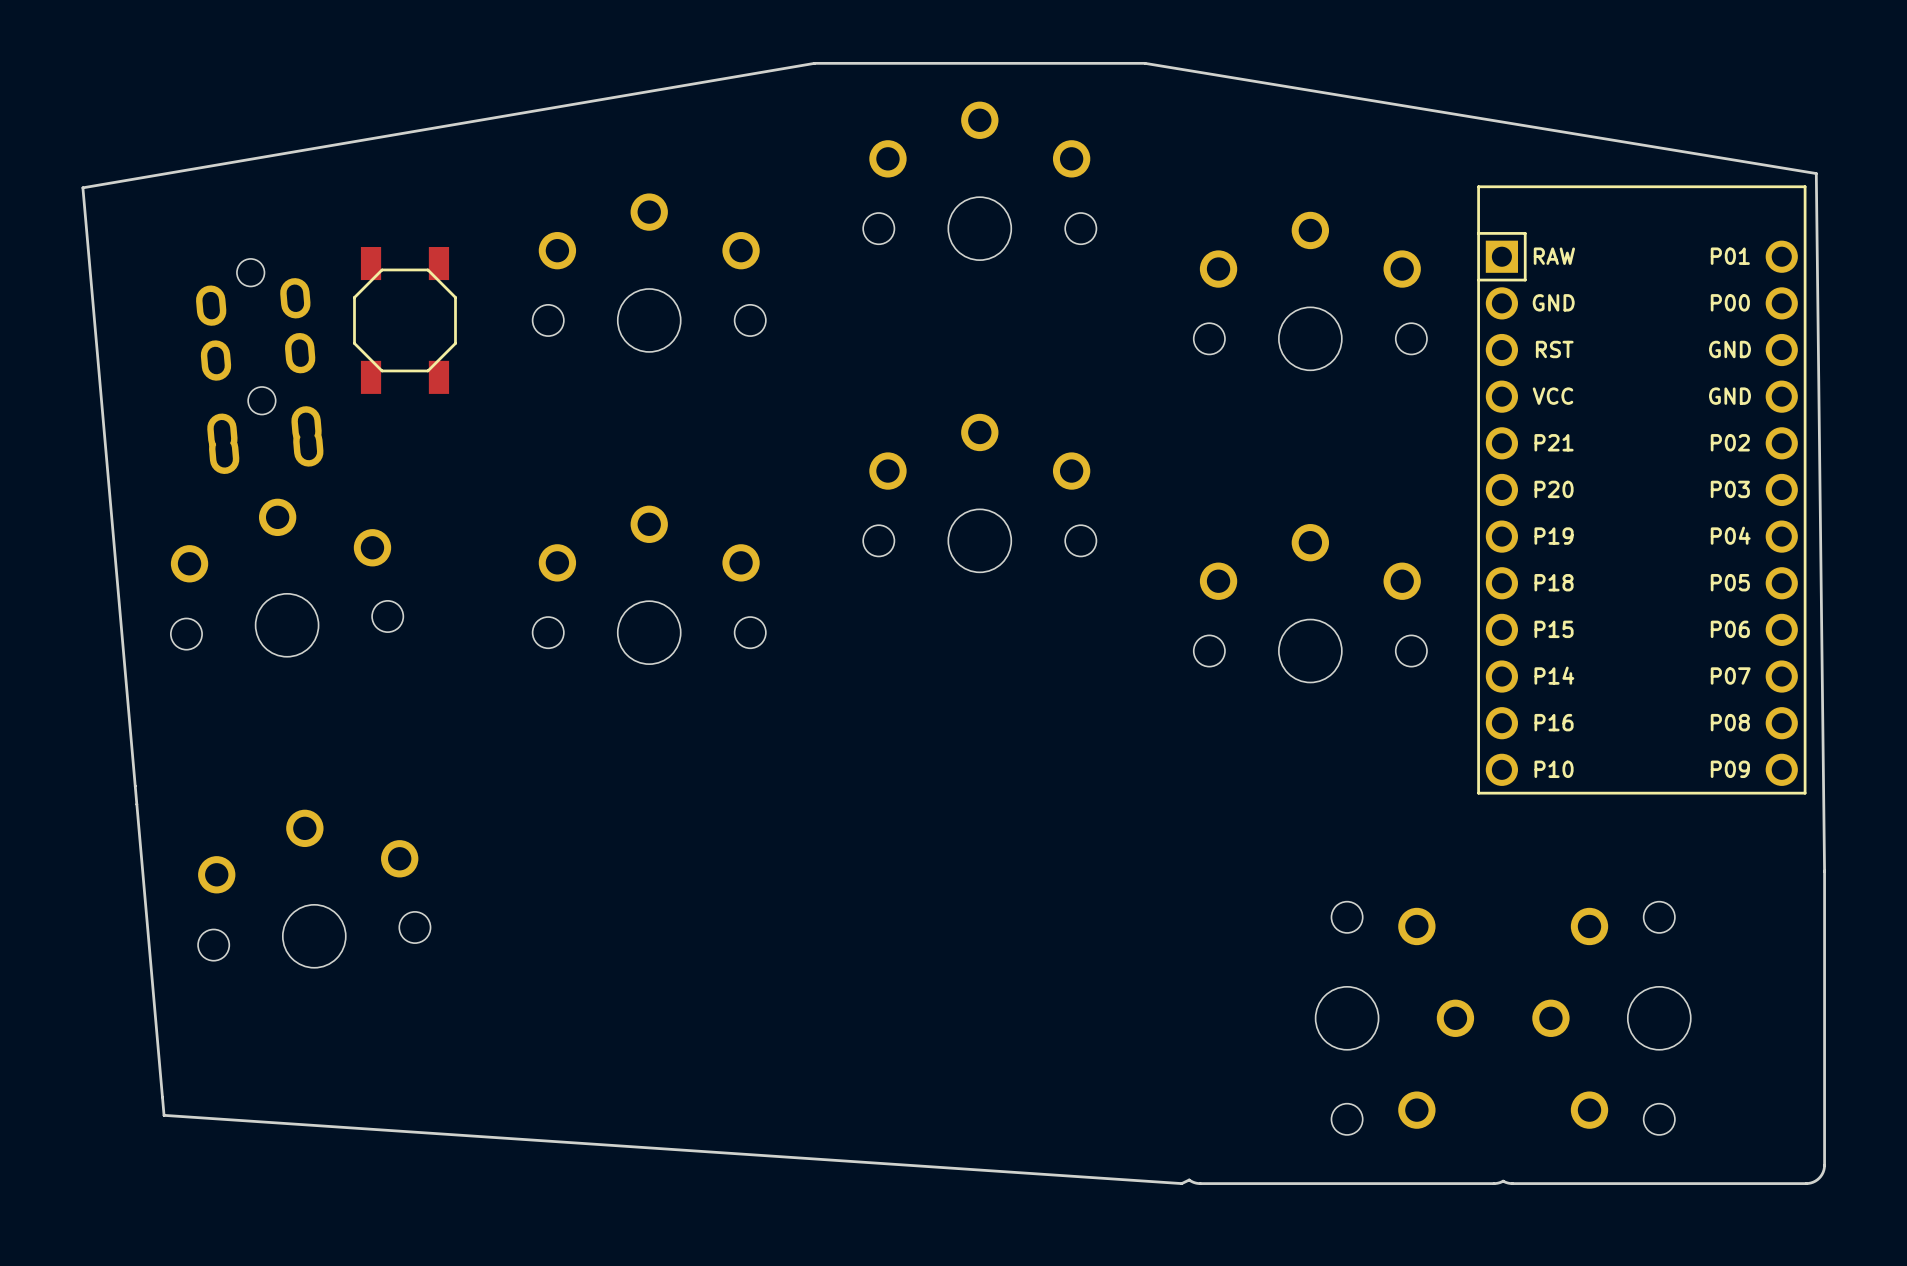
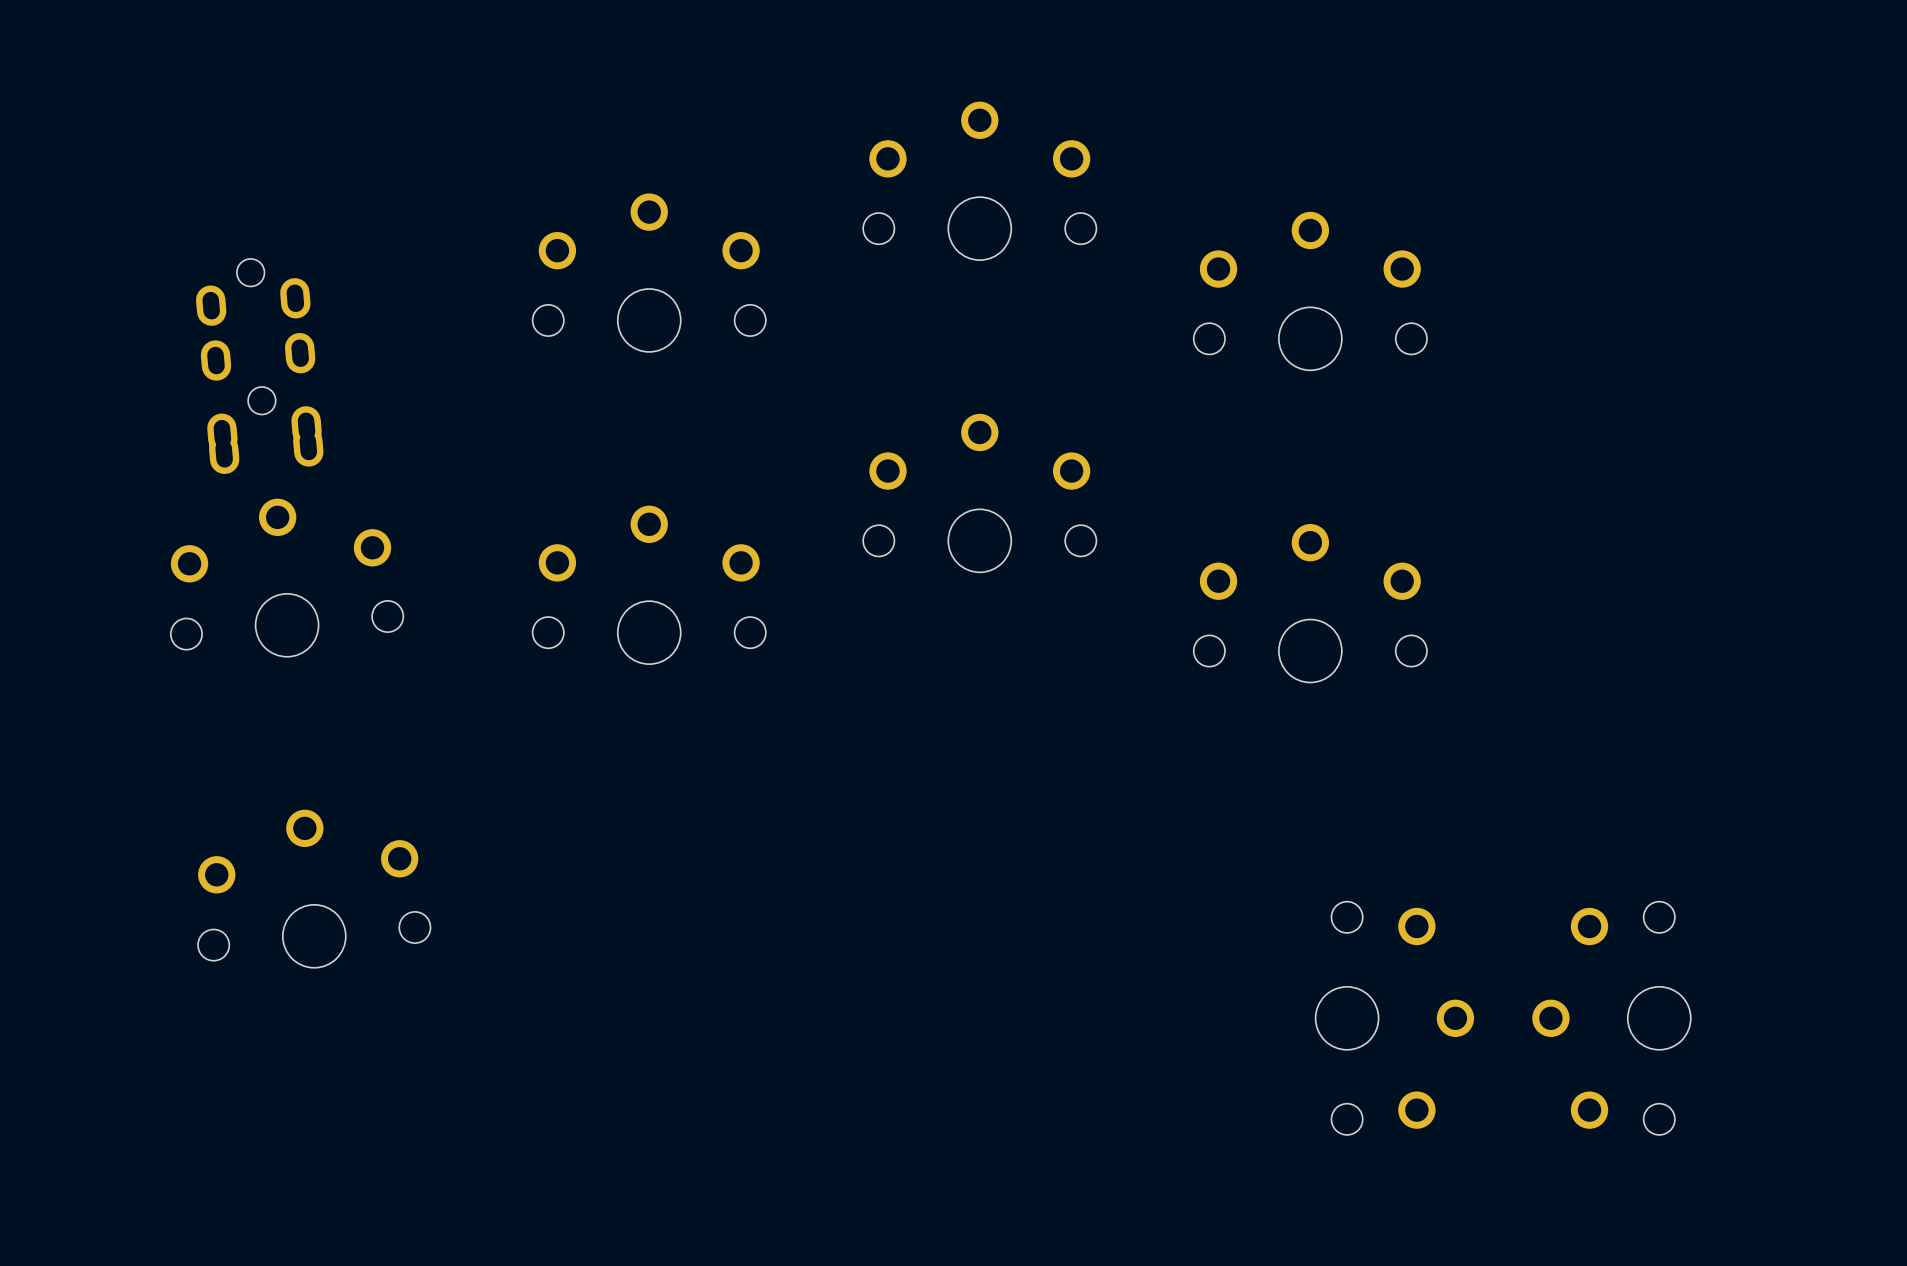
board edge: (814, 63) (1145, 63) (1816, 173) (1824, 871) (1824, 1165) (1819, 1178) (1806, 1183) (1512, 1183) (1503, 1181) (1494, 1183) (1200, 1183) (1189, 1179) (1181, 1183) (164, 1115) (82, 187) (814, 63) -> none
part: (404, 320) -> none
part: (1641, 489) -> none

